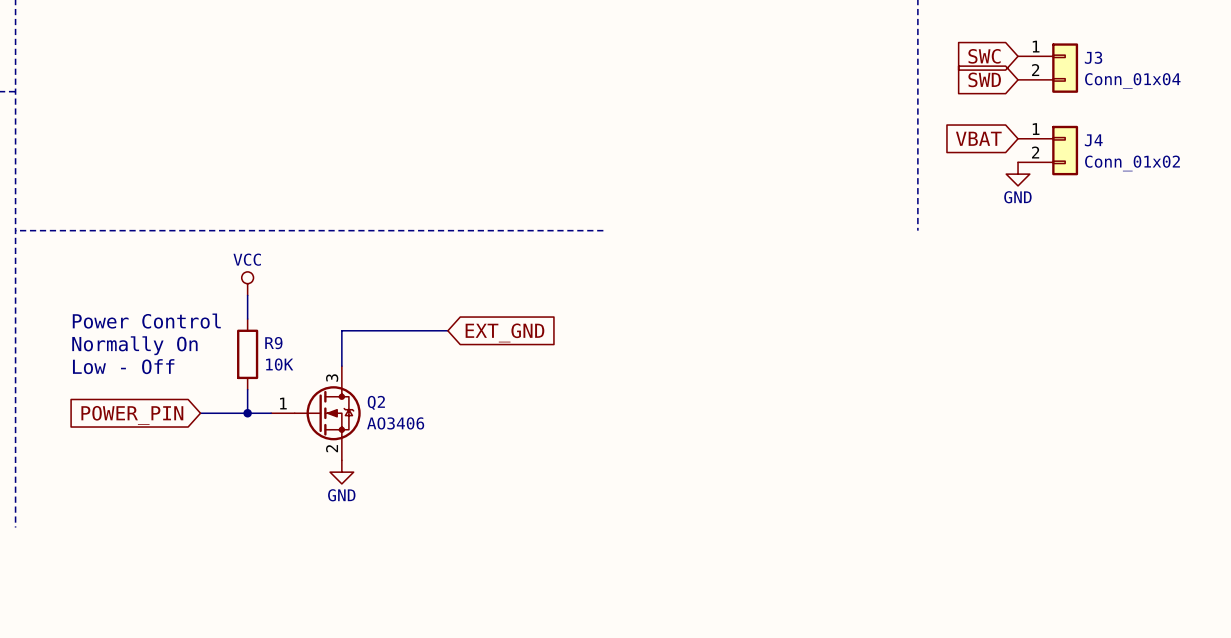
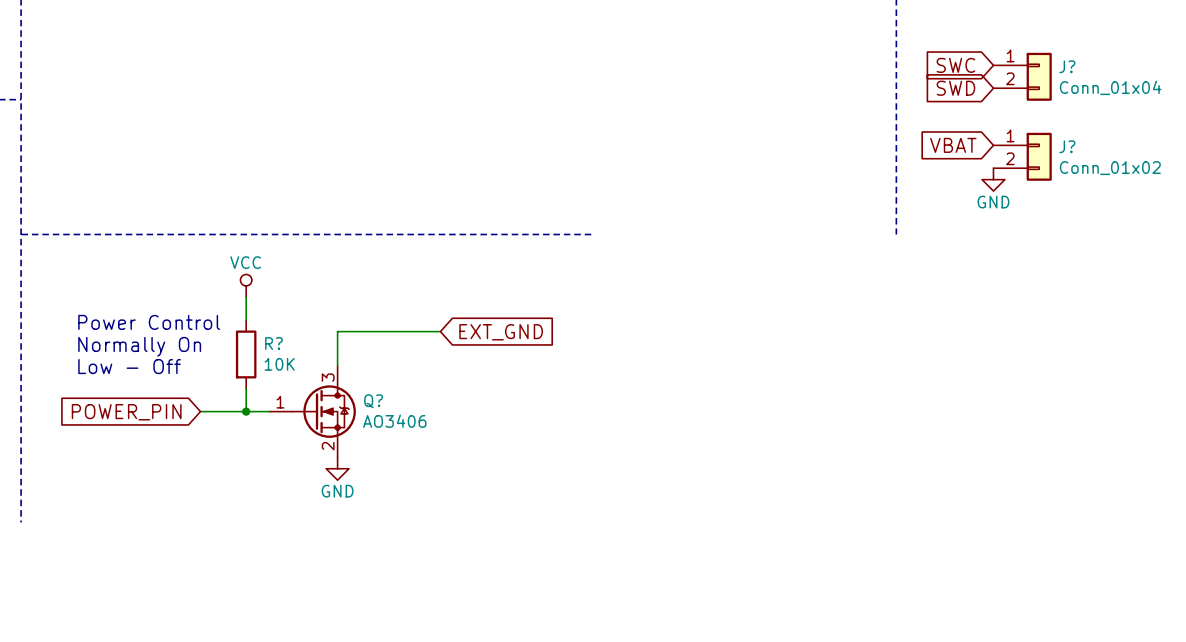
J3 name: J3 (1093, 57) -> J? (1067, 66)
J4 name: J4 (1093, 140) -> J? (1067, 146)
R9 name: R9 (273, 343) -> R? (273, 343)
Q2 name: Q2 (376, 402) -> Q? (373, 401)

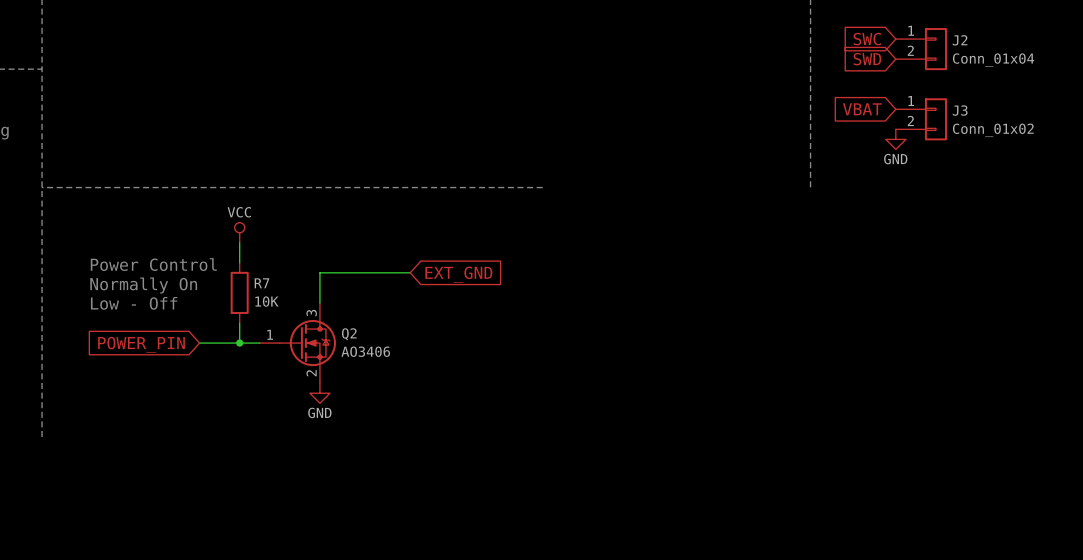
J? name: J? (1067, 66) -> J2 (960, 40)
J? name: J? (1067, 146) -> J3 (960, 110)
R? name: R? (273, 343) -> R7 (261, 283)
Q? name: Q? (373, 401) -> Q2 (349, 334)

